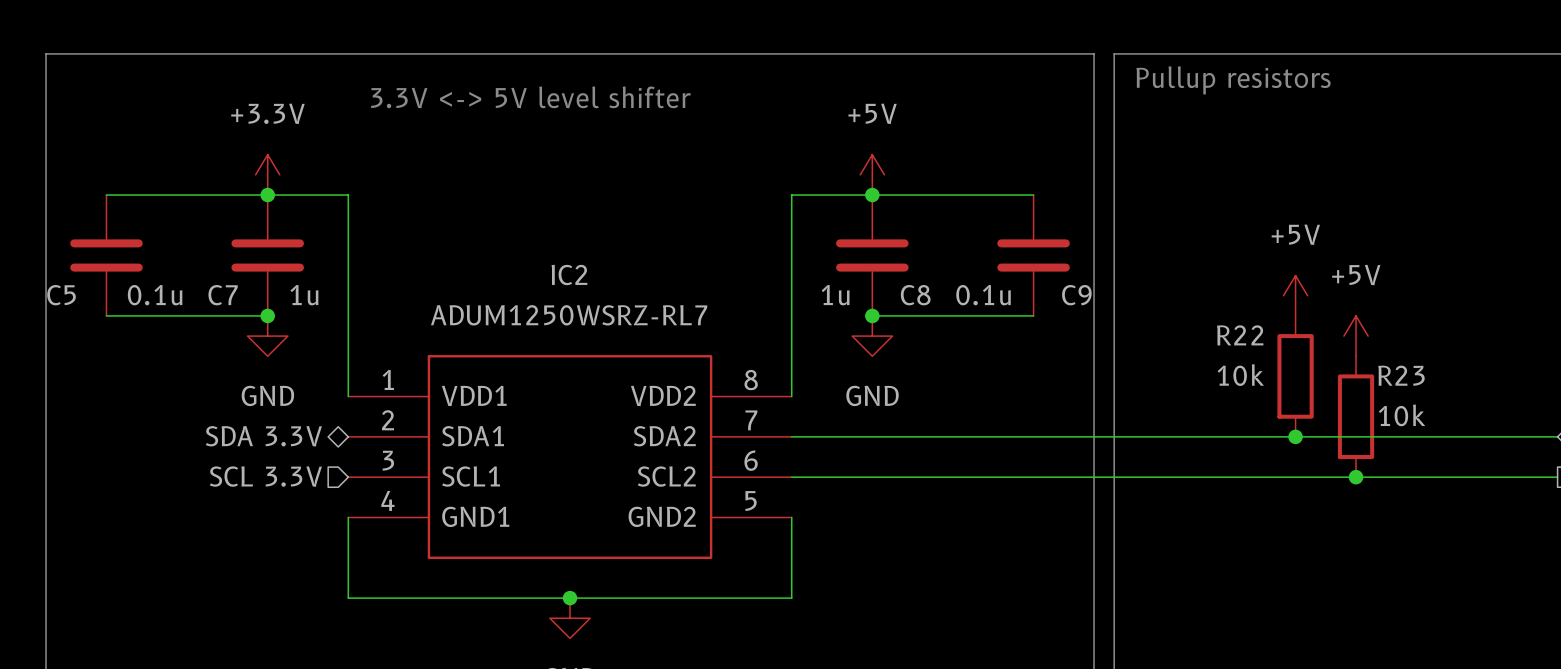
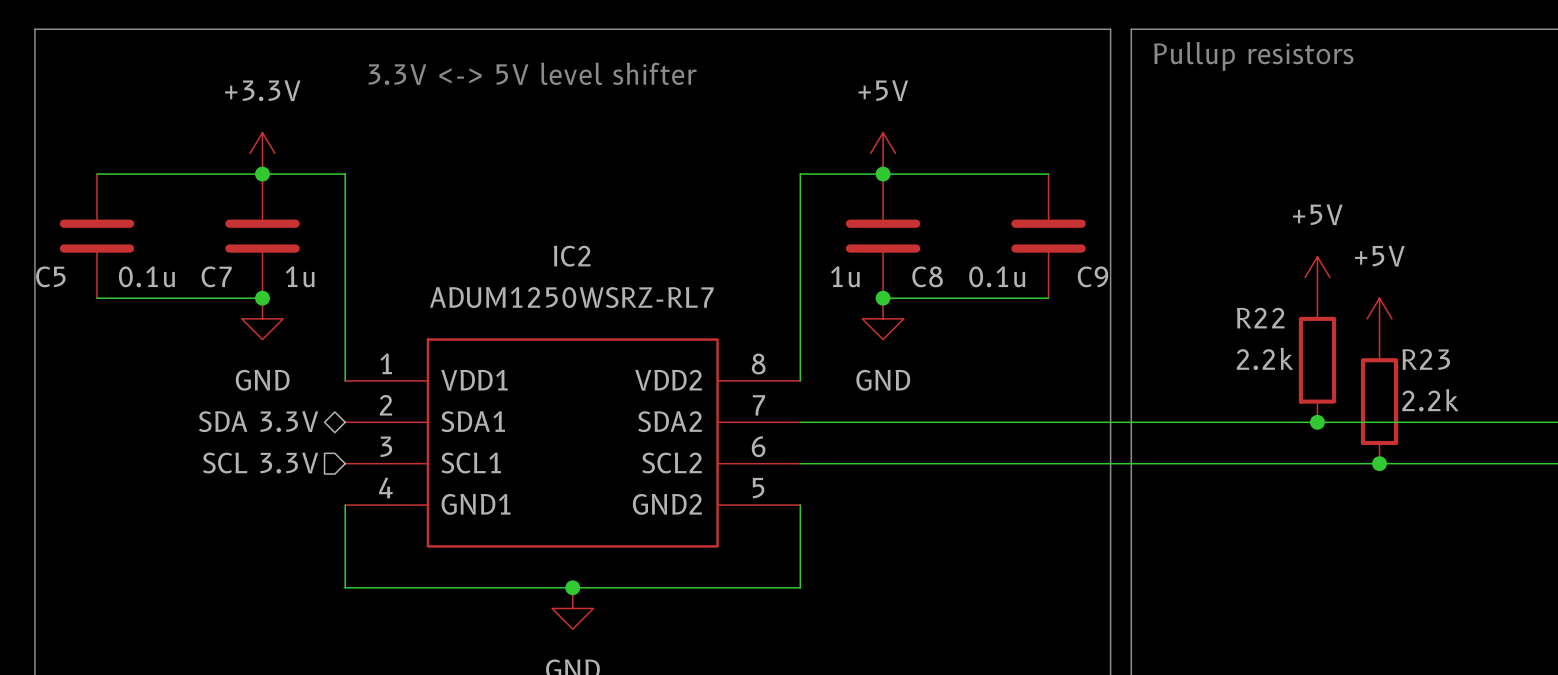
R22 value: 10k (1240, 375) -> 2.2k (1265, 358)
R23 value: 10k (1402, 415) -> 2.2k (1430, 400)

